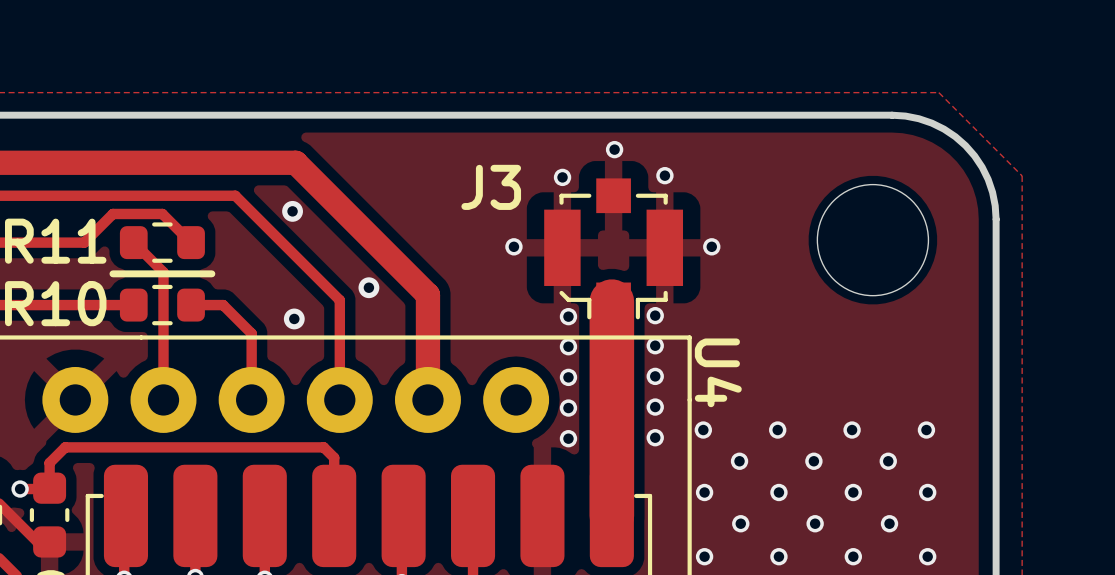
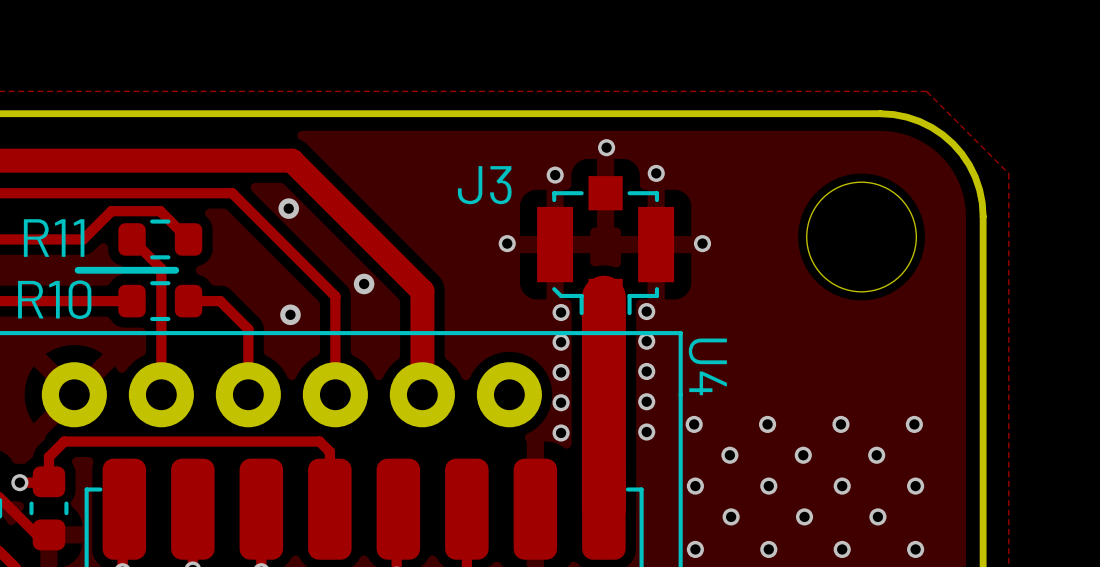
line: (178, 273) (211, 273) -> (78, 270) (111, 270)

